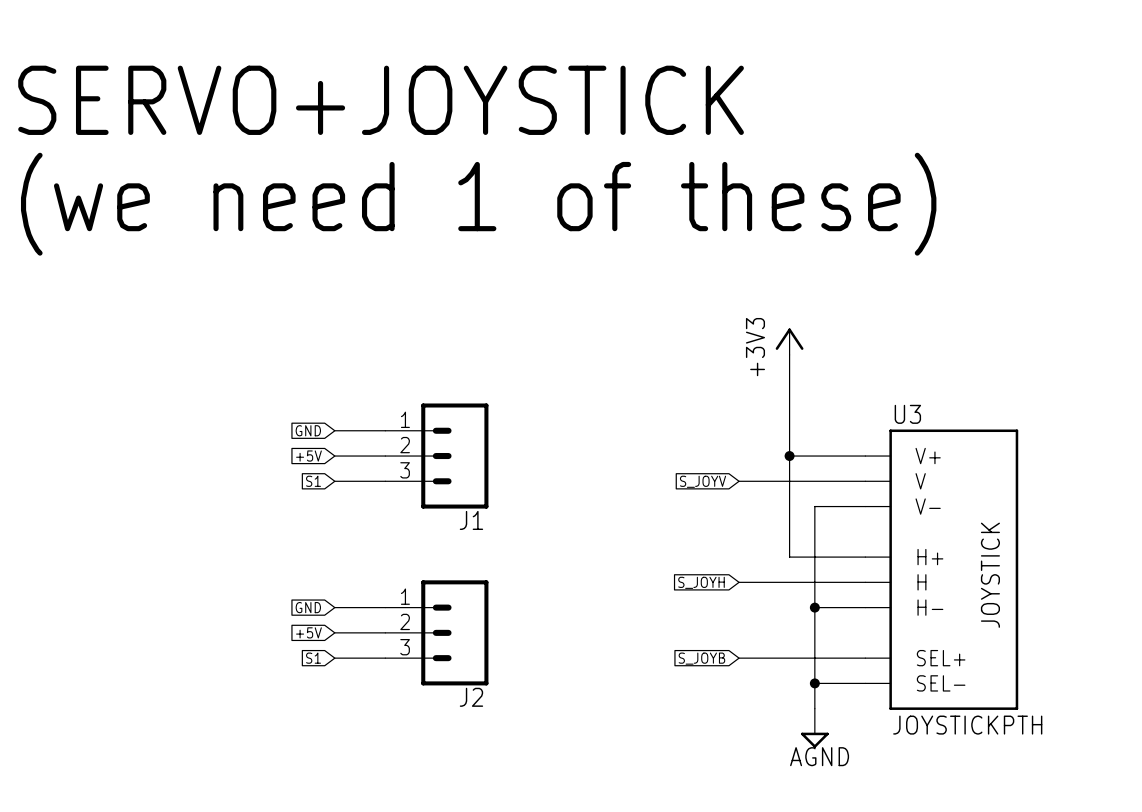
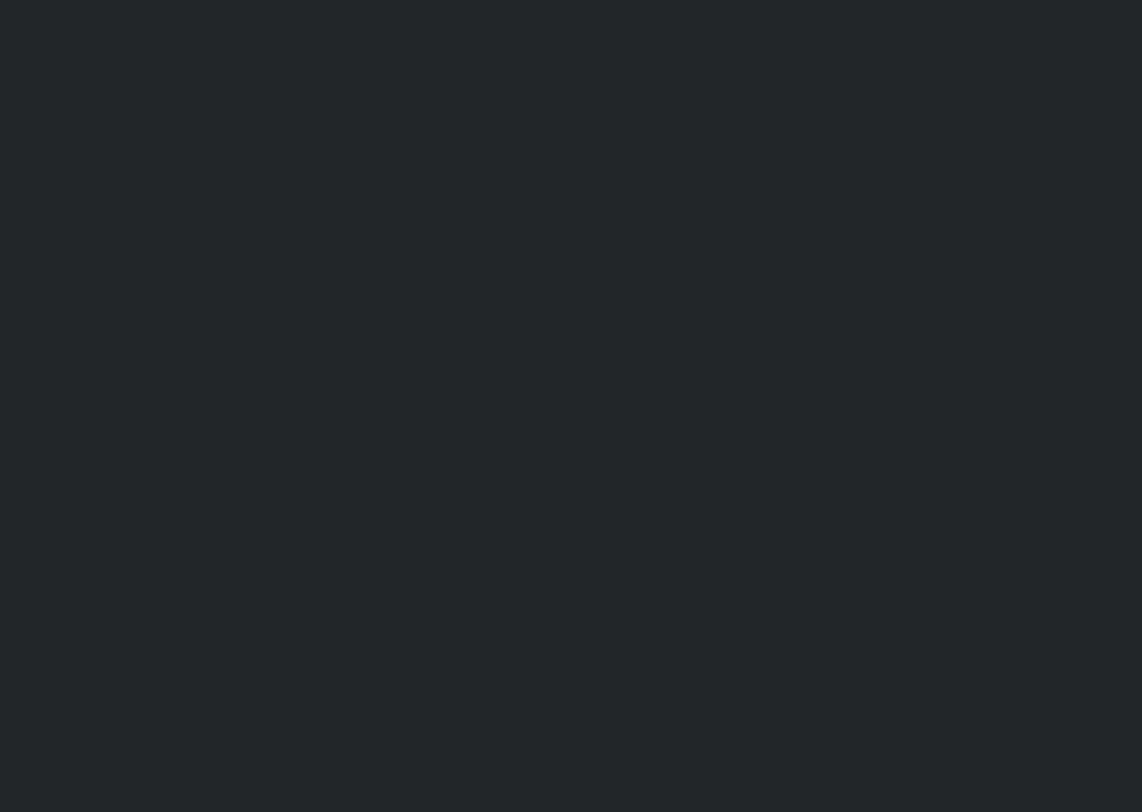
text: SERVO+JOYSTICK (381, 100) -> none
text: (we need 1 of these) (478, 204) -> none
power symbol: +3V3 (789, 341) -> none
wire: (789, 354) (789, 557) (865, 557) -> none
global label: GND (308, 430) -> none
wire: (334, 430) (385, 430) -> none
global label: +5V (308, 456) -> none
wire: (334, 456) (385, 456) -> none
J1: (436, 456) -> none
wire: (789, 456) (865, 456) -> none
junction: (789, 456) -> none
global label: S1 (313, 481) -> none
wire: (334, 481) (385, 481) -> none
global label: S_JOYV (703, 481) -> none
wire: (739, 481) (865, 481) -> none
wire: (865, 506) (814, 506) (814, 708) -> none
U3: JOYSTICKPTH (941, 569) -> none
global label: S_JOYH (701, 582) -> none
wire: (739, 582) (865, 582) -> none
global label: GND (308, 607) -> none
wire: (334, 607) (385, 607) -> none
wire: (814, 607) (865, 607) -> none
junction: (814, 607) -> none
global label: +5V (308, 632) -> none
wire: (334, 632) (385, 632) -> none
J2: (436, 632) -> none
global label: S1 (313, 658) -> none
wire: (334, 658) (385, 658) -> none
global label: S_JOYB (701, 658) -> none
wire: (739, 658) (865, 658) -> none
wire: (814, 683) (865, 683) -> none
junction: (814, 683) -> none
power symbol: AGND (814, 728) -> none

